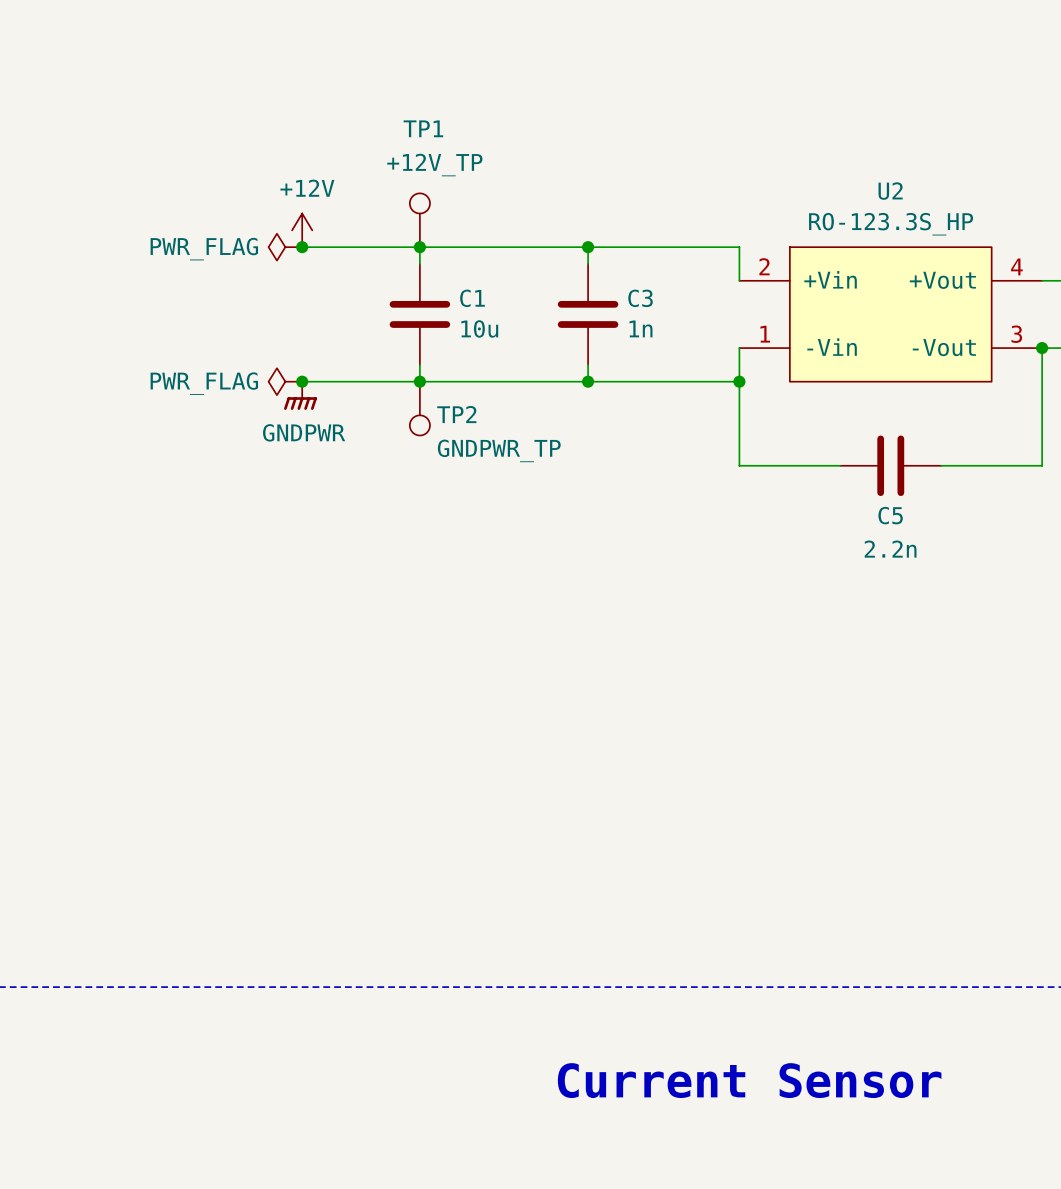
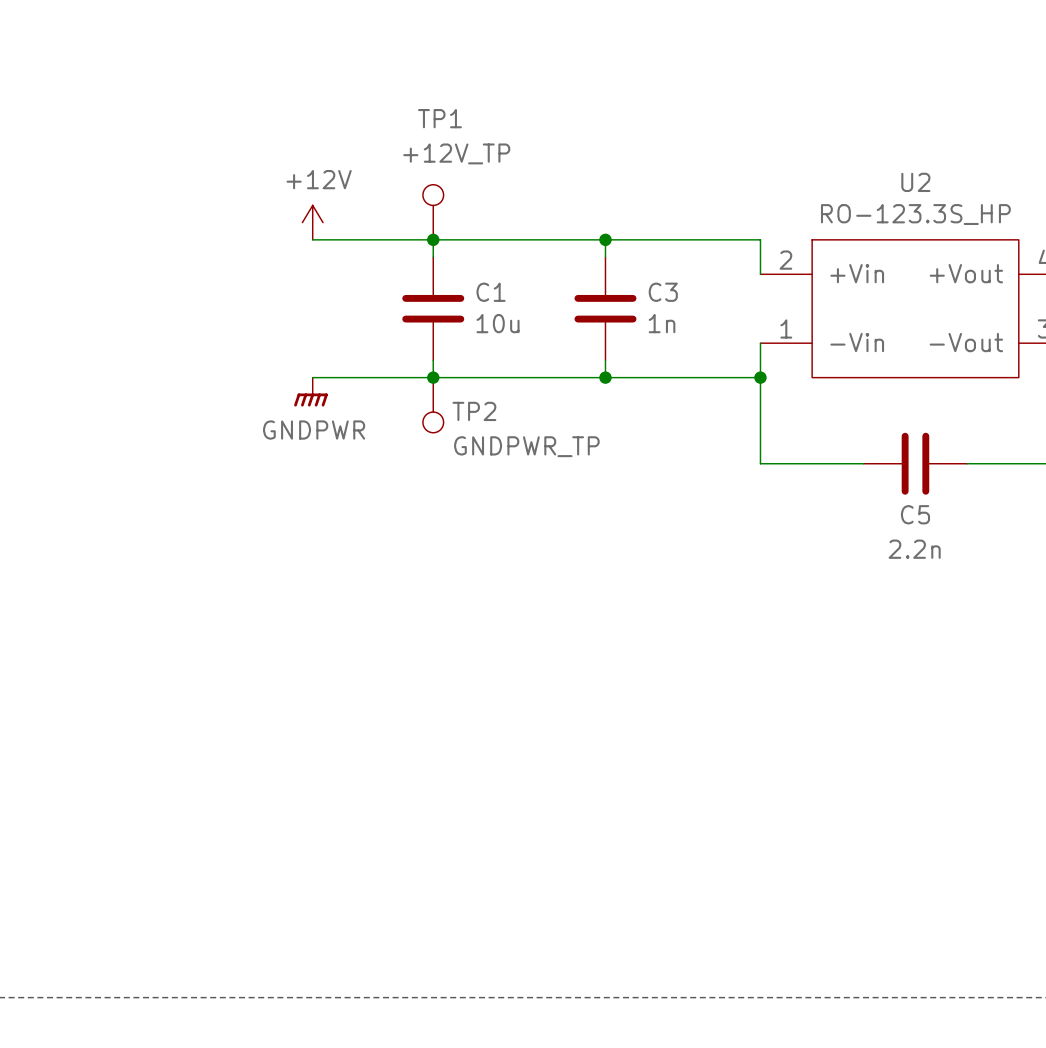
power symbol: PWR_FLAG (285, 247) -> none
junction: (302, 247) -> none
power symbol: PWR_FLAG (285, 381) -> none
junction: (302, 381) -> none

